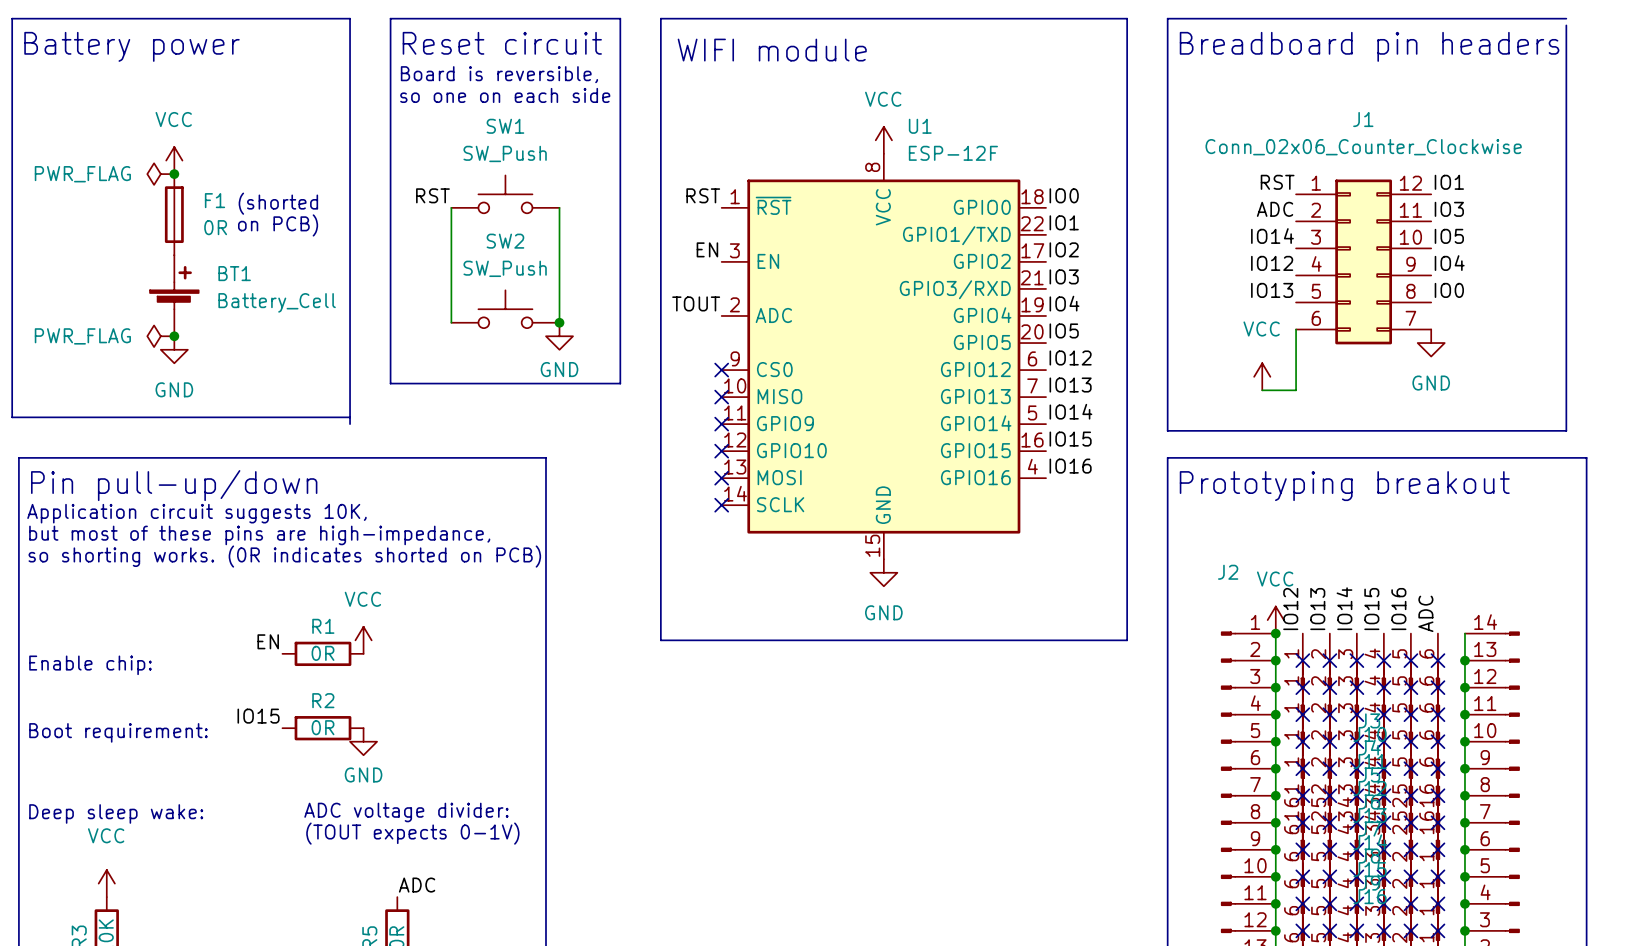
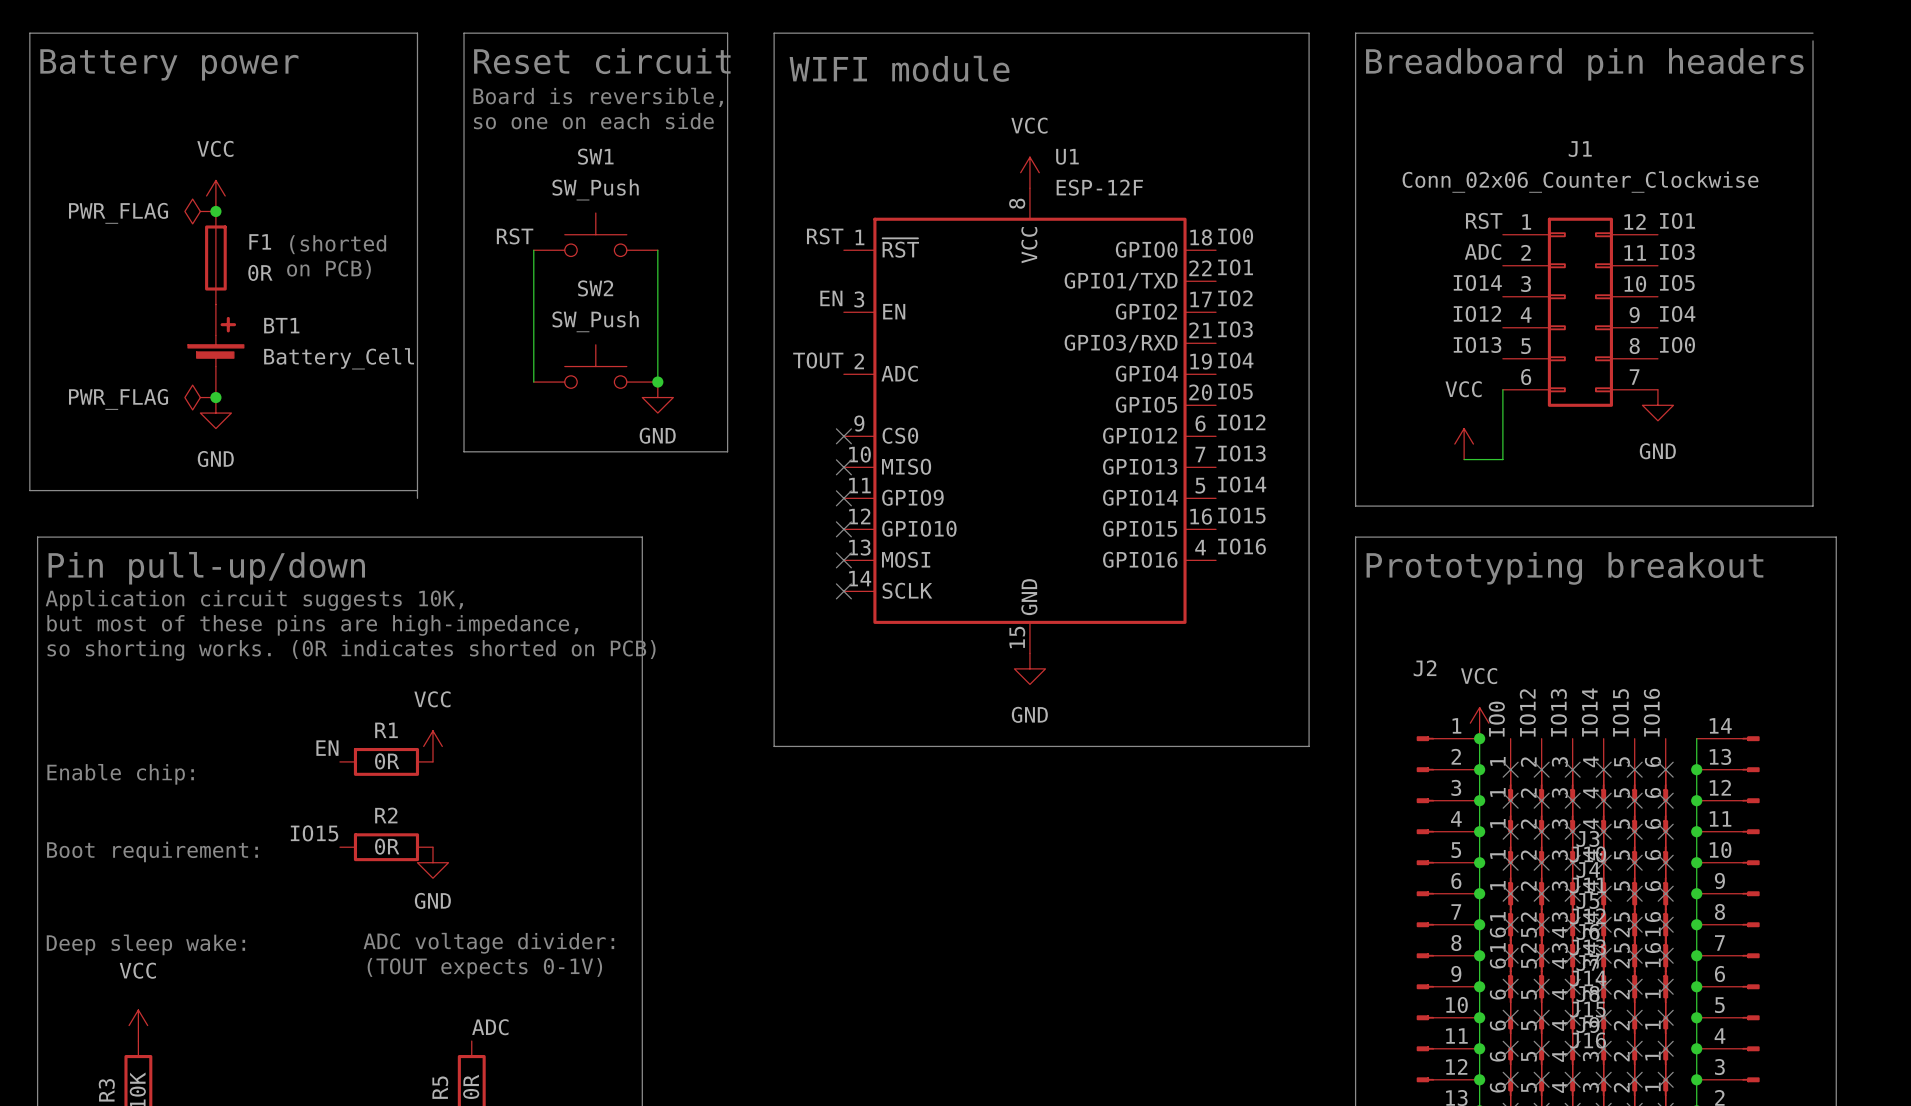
label: IO14 (1344, 608) -> IO13 (1558, 712)
label: IO12 (1290, 609) -> IO0 (1496, 719)
label: IO13 (1317, 609) -> IO12 (1527, 712)
label: IO15 (1371, 609) -> IO14 (1589, 712)
label: IO16 (1398, 609) -> IO15 (1620, 712)
label: ADC (1425, 613) -> IO16 (1651, 712)

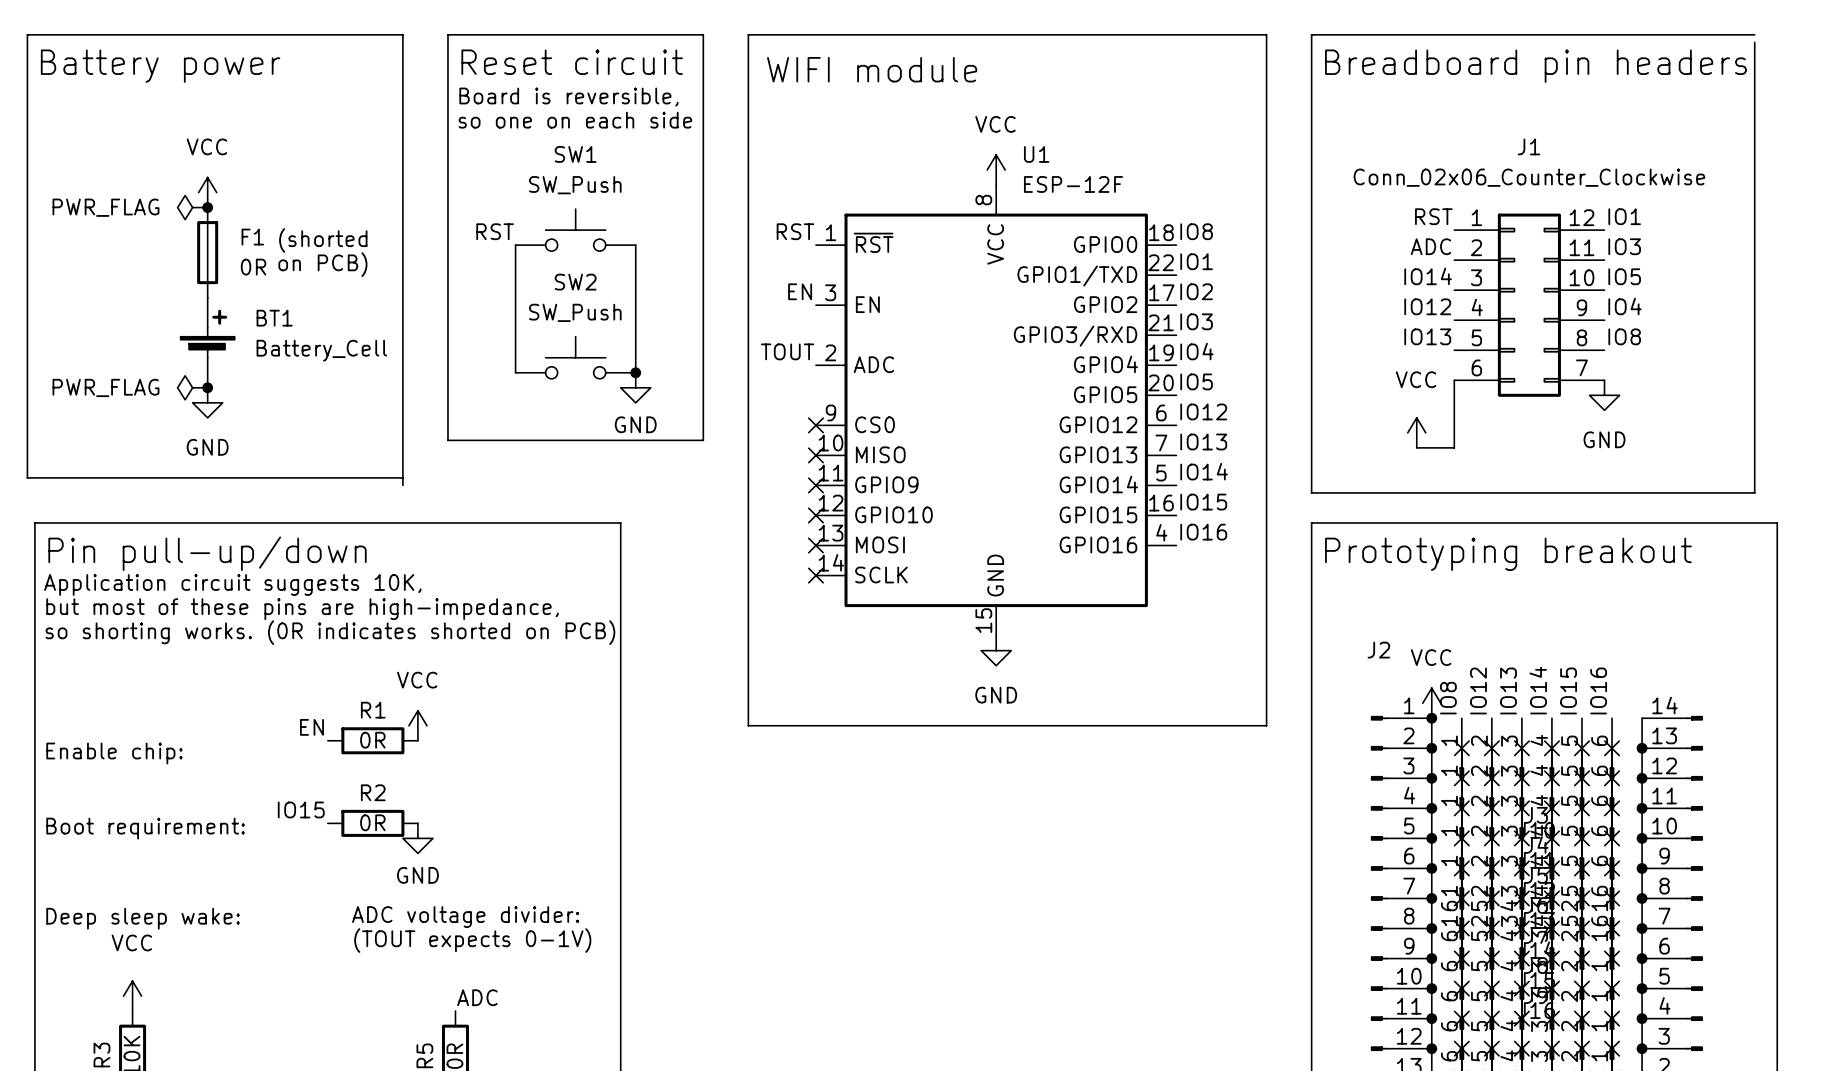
label: IO0 (1235, 236) -> IO8 (1196, 231)
label: IO0 (1677, 344) -> IO8 (1624, 336)
label: IO0 (1496, 719) -> IO8 (1448, 698)

